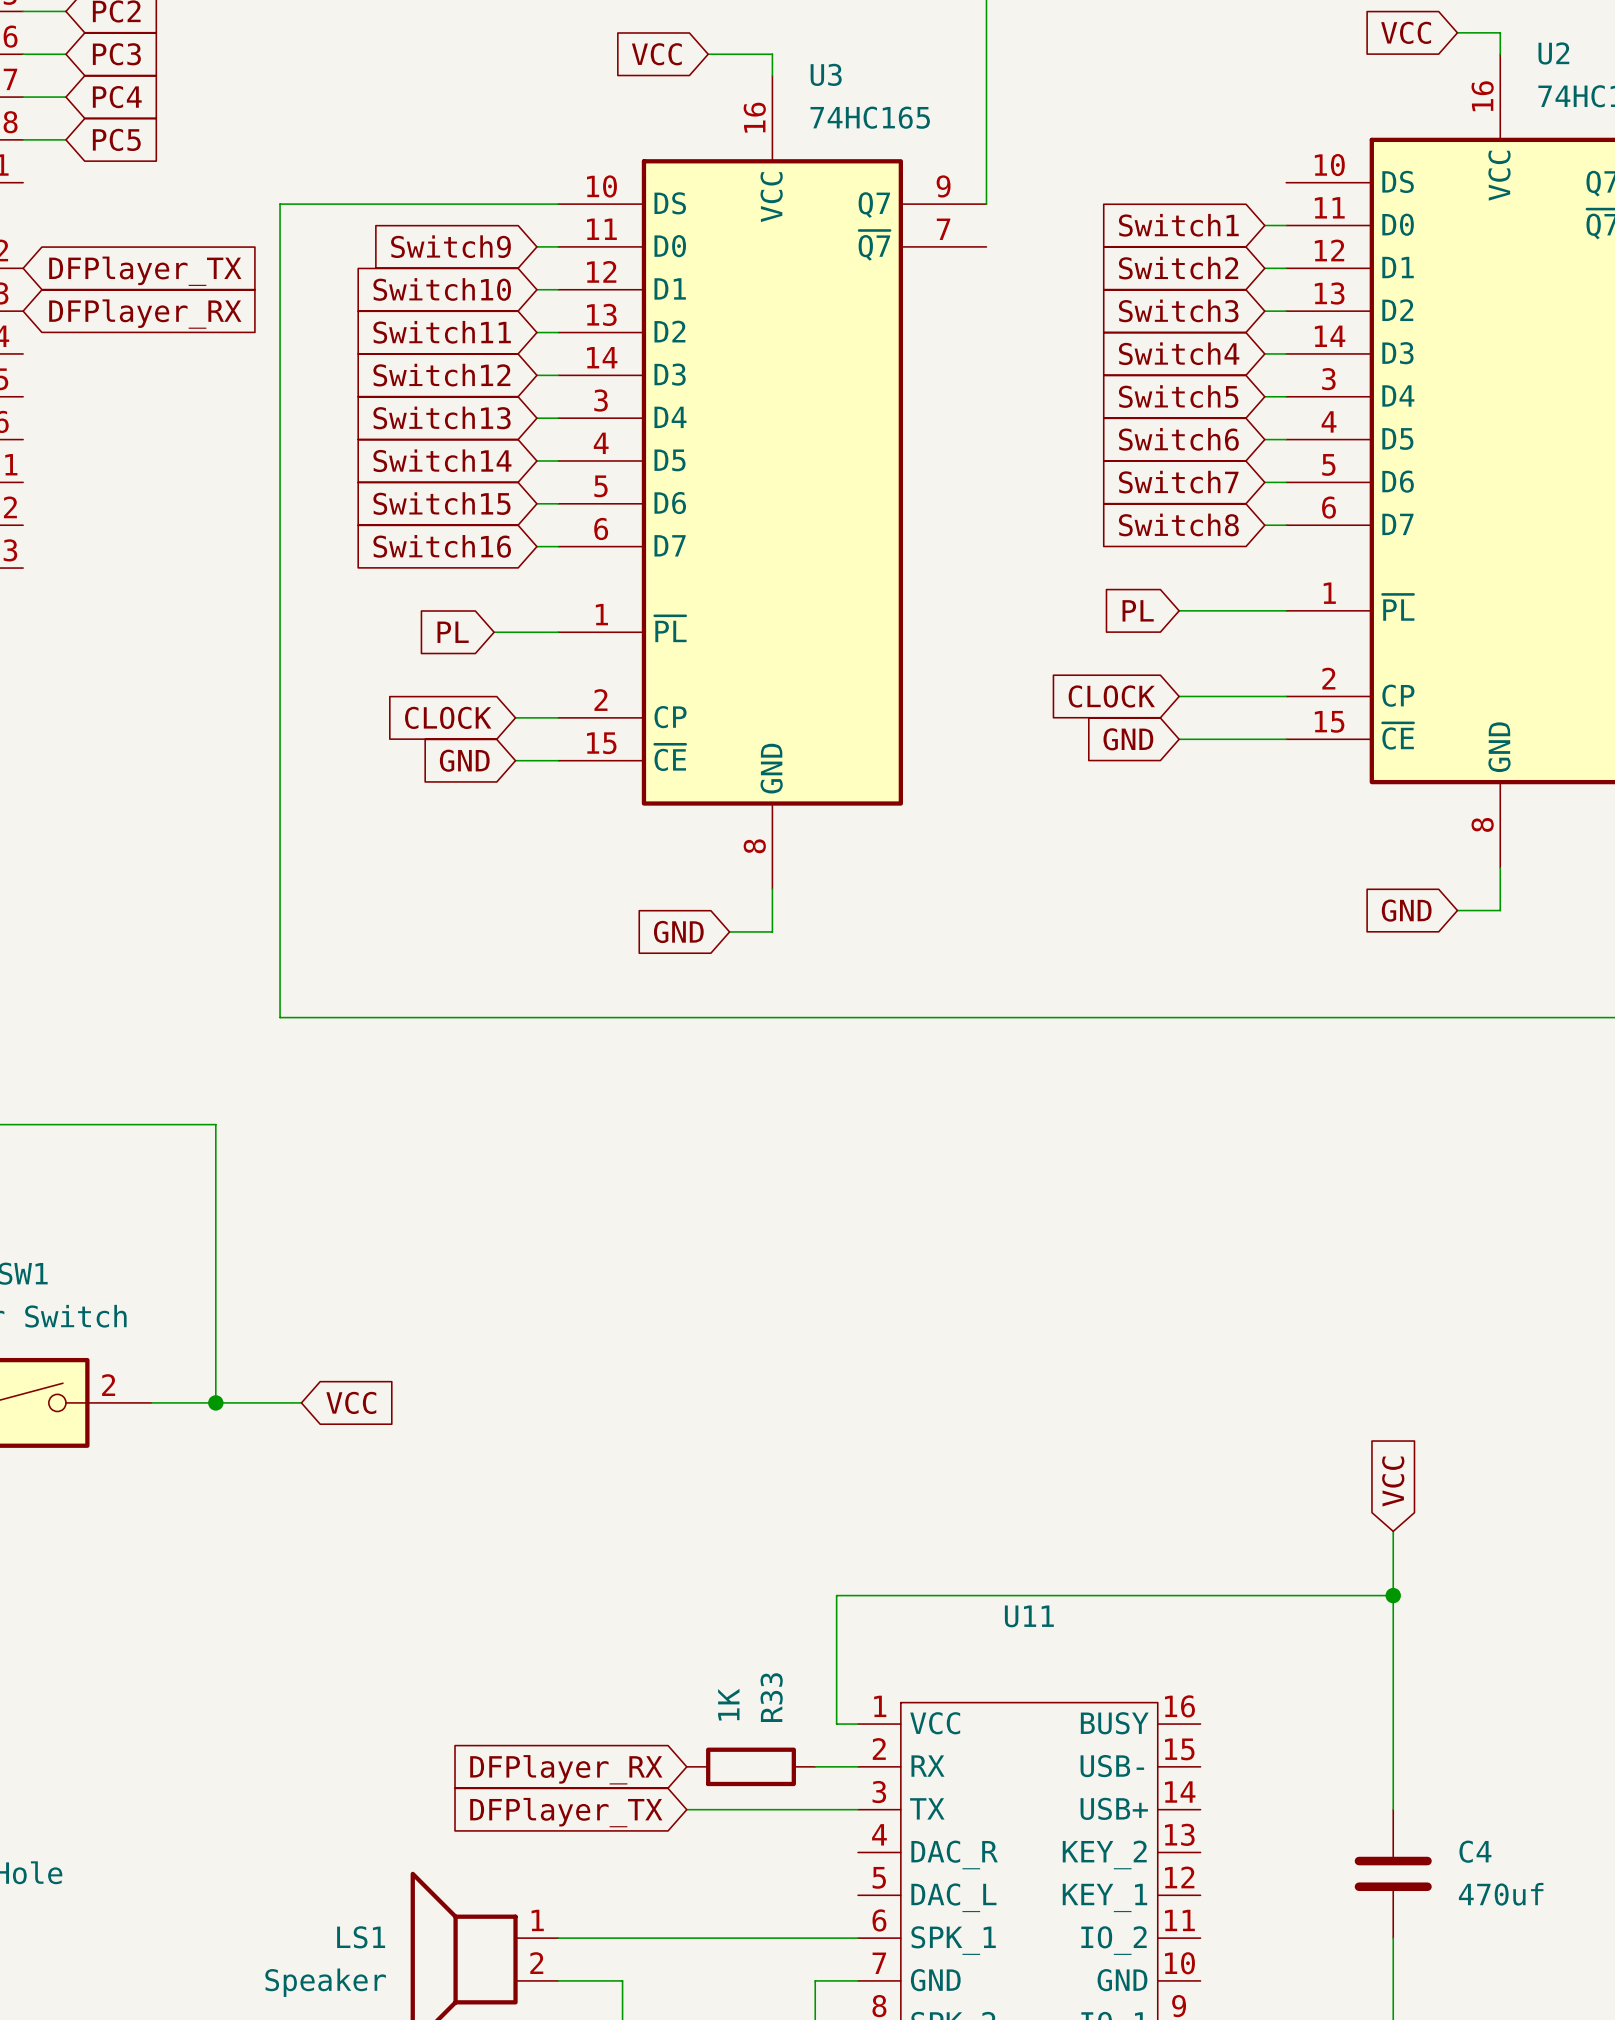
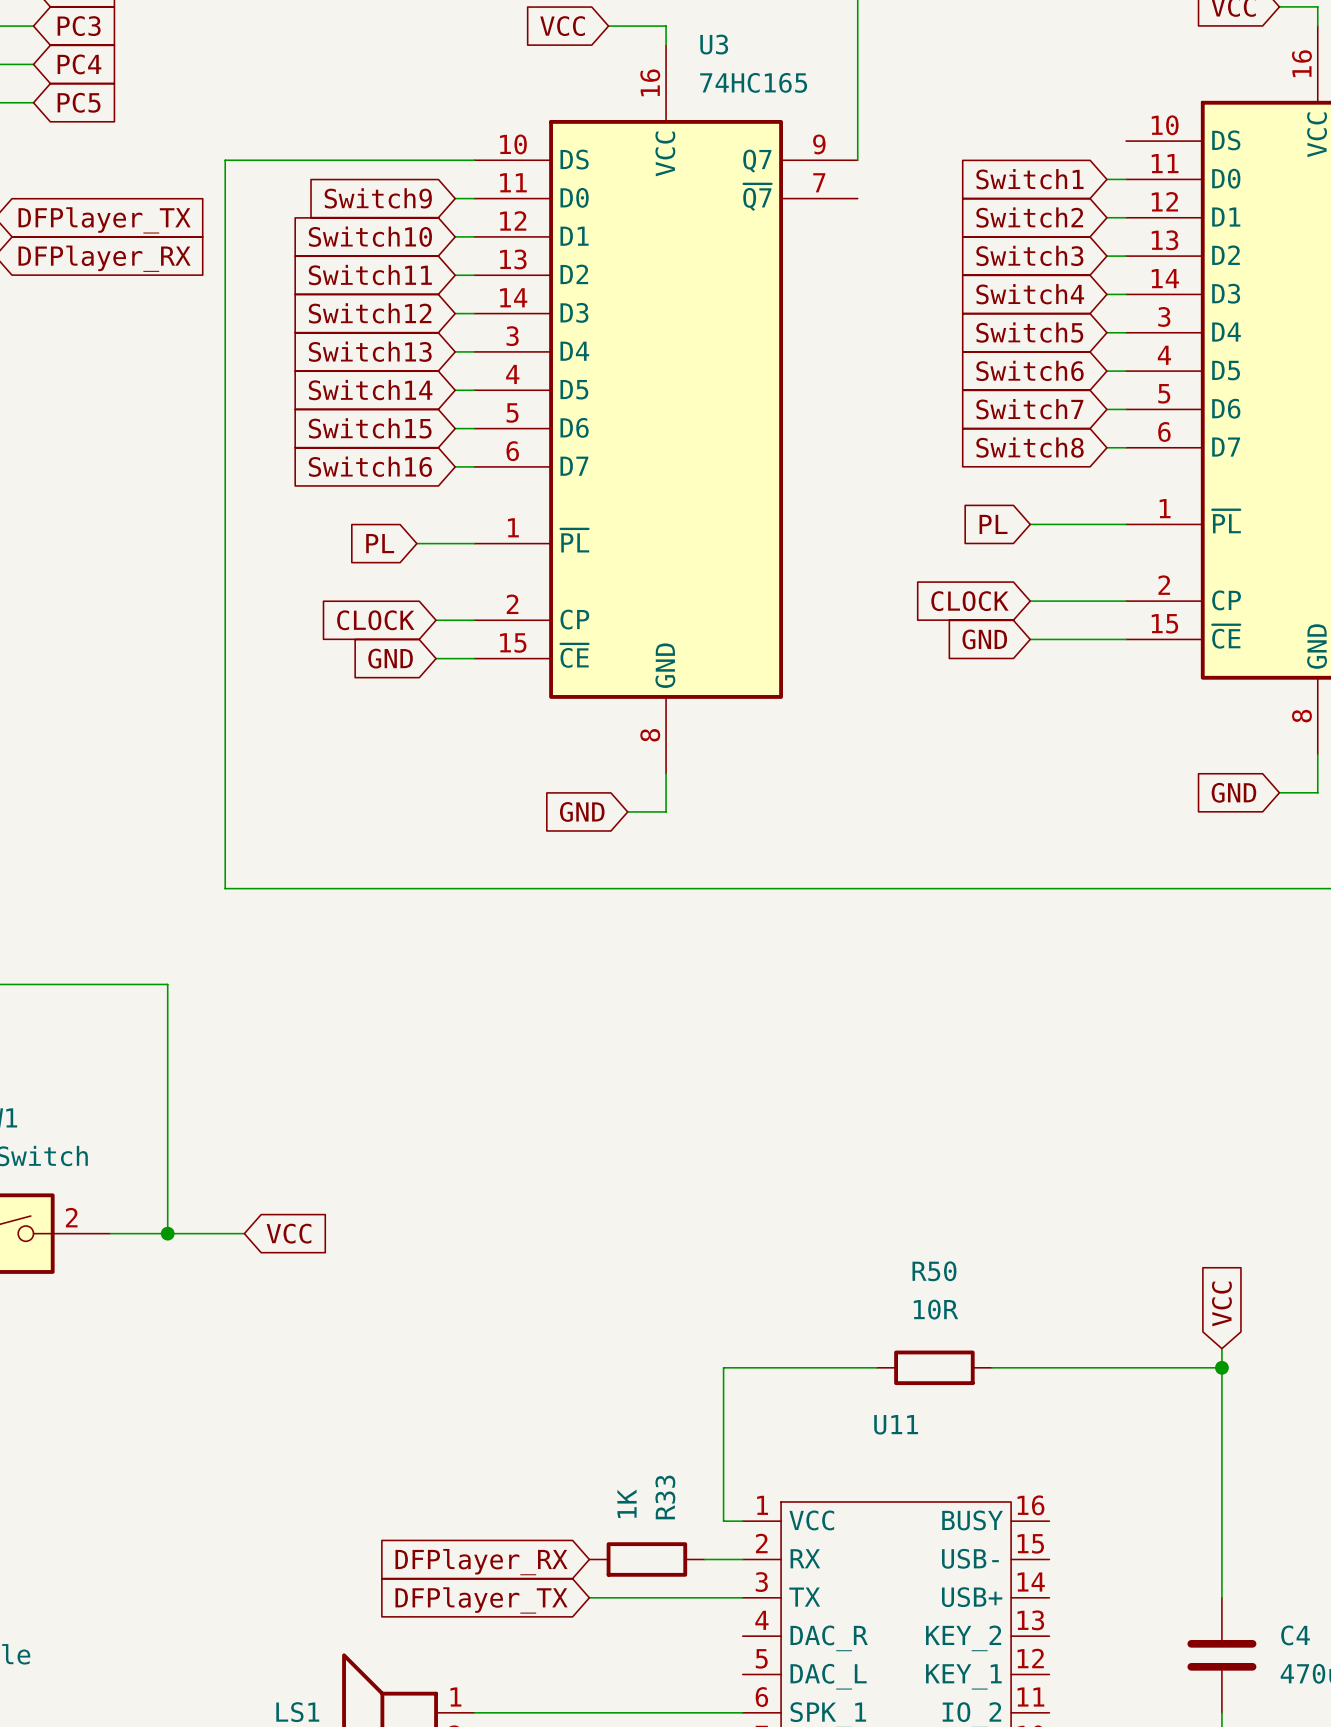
R50: none -> 10R (934, 1367)
wire: none -> (991, 1367) (1221, 1367)
wire: (836, 1595) (1393, 1595) -> (723, 1406) (723, 1367) (876, 1367)
junction position: (1393, 1595) -> (1221, 1367)

